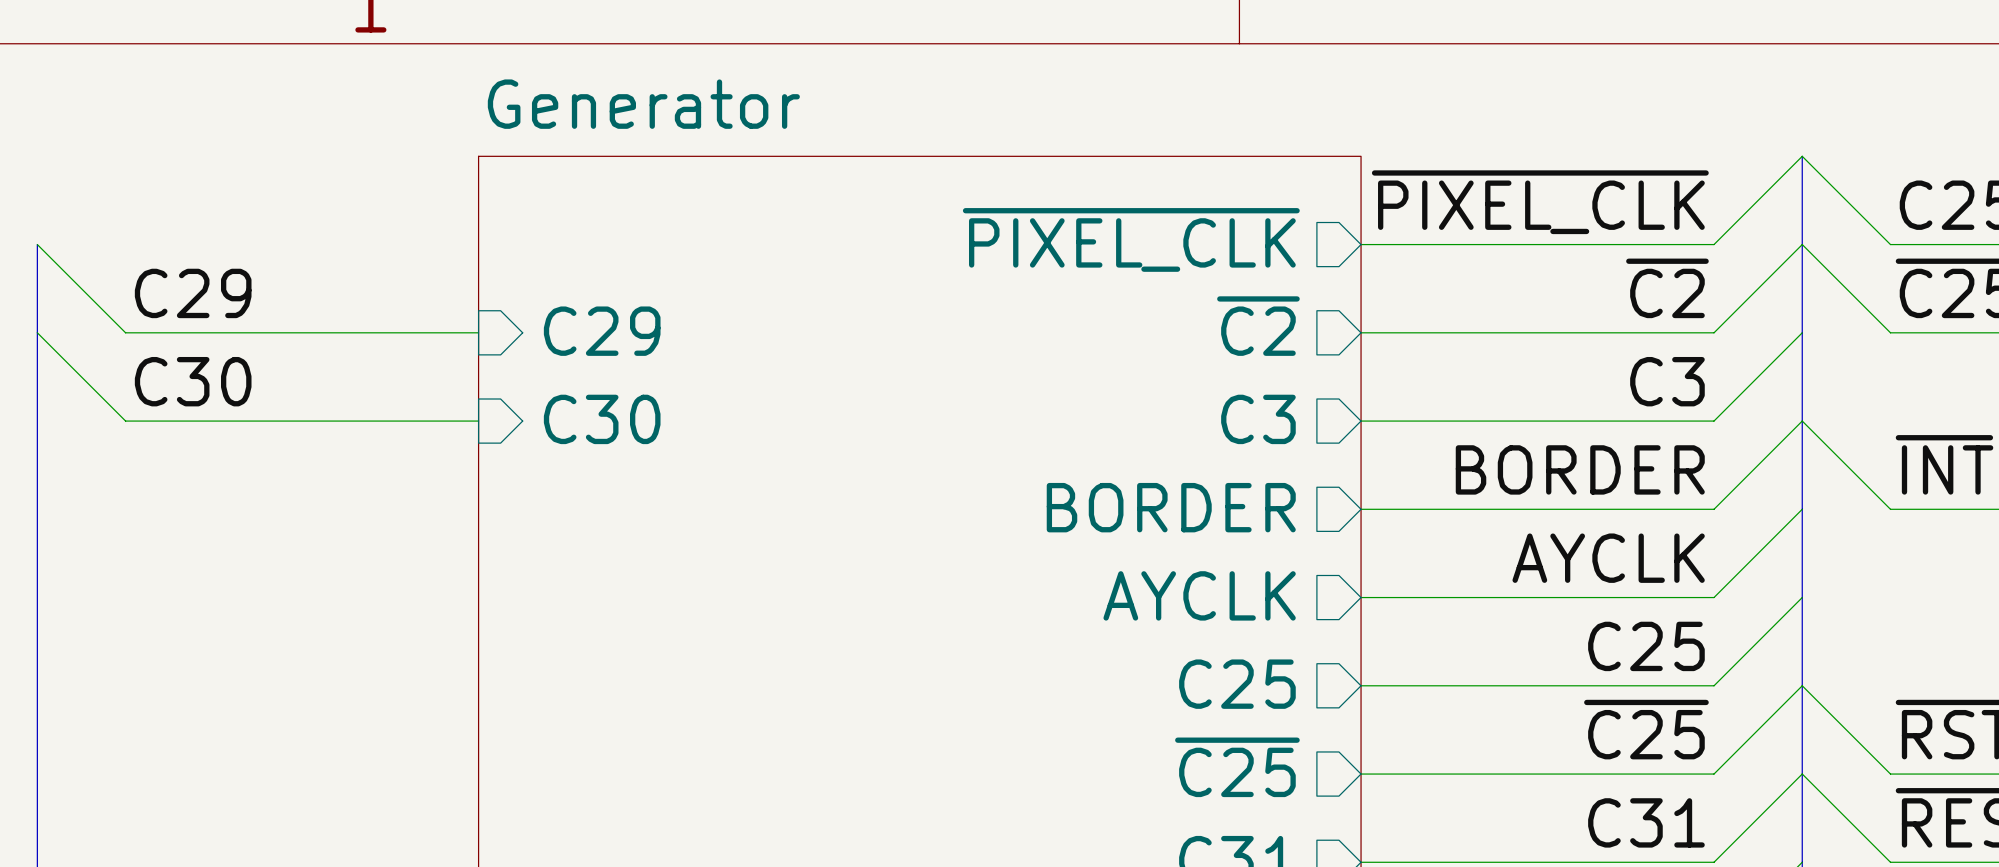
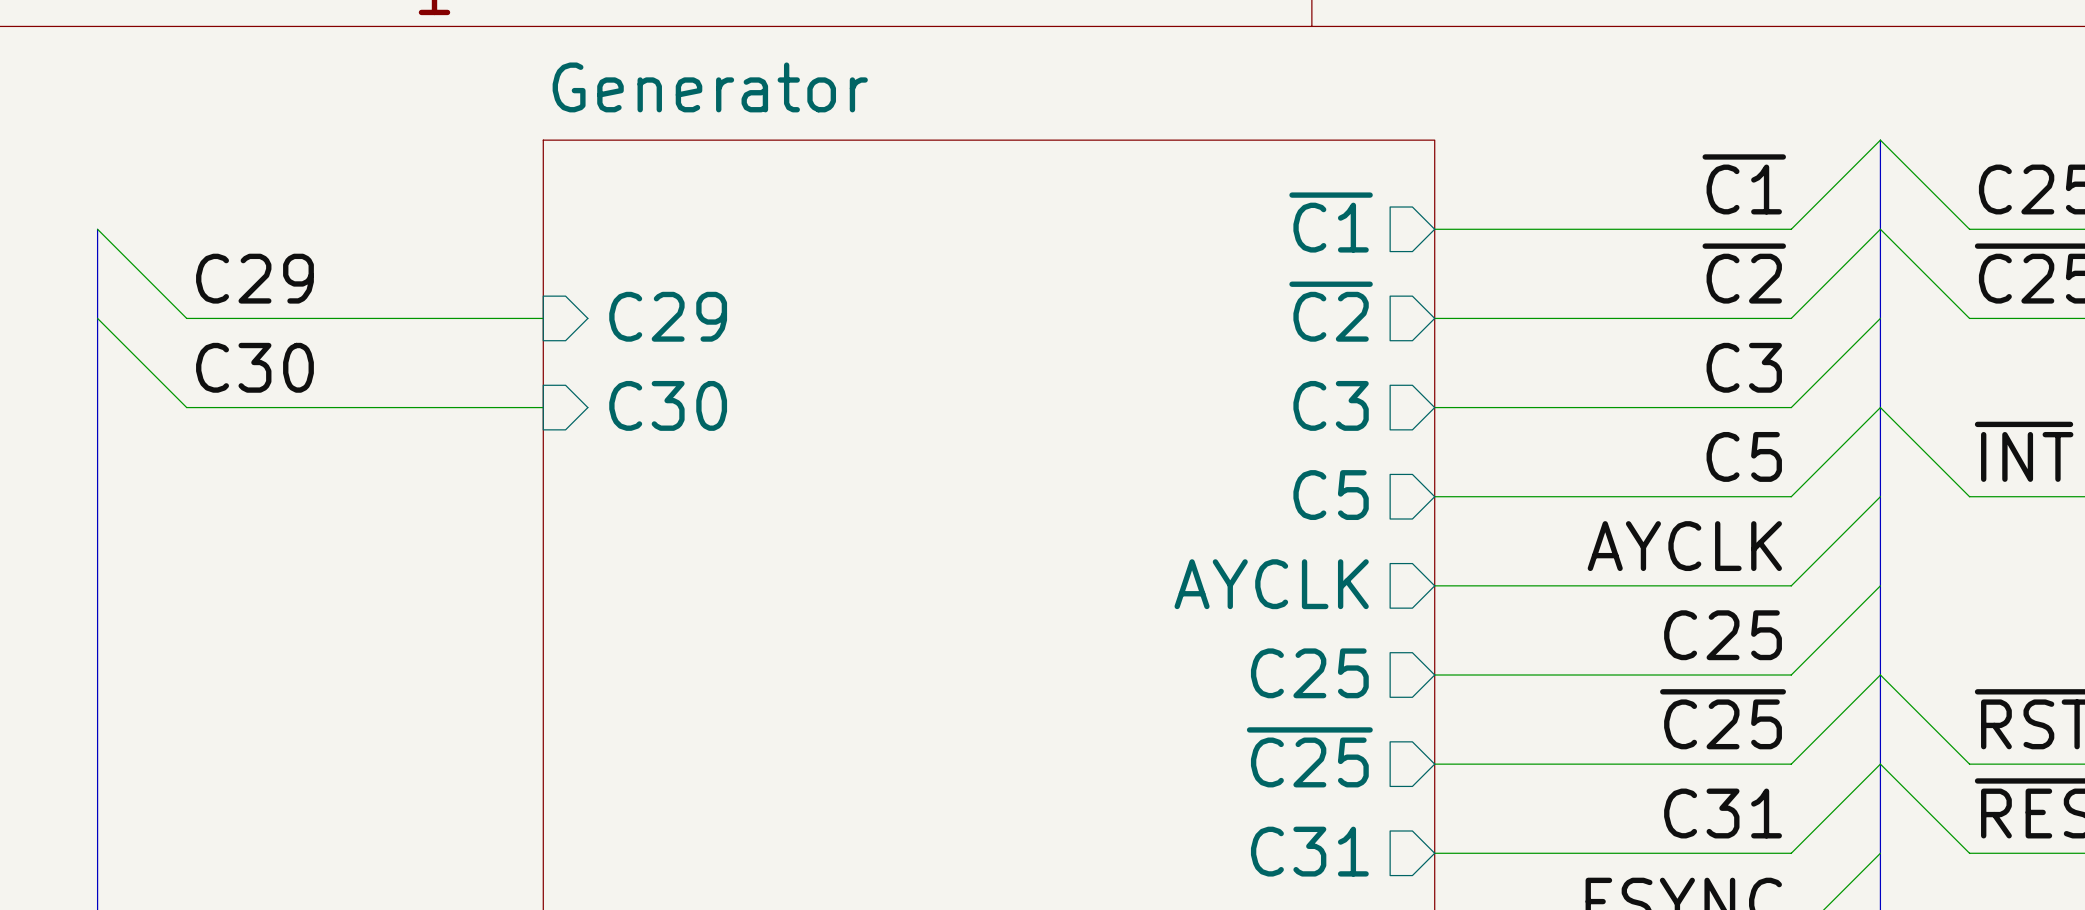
label: ~{PIXEL_CLK} (1540, 202) -> ~{C1} (1744, 184)
sheet pin: ~{PIXEL_CLK} (1131, 239) -> ~{C1} (1331, 222)
label: BORDER (1580, 469) -> C5 (1744, 456)
sheet pin: BORDER (1171, 507) -> C5 (1331, 495)

